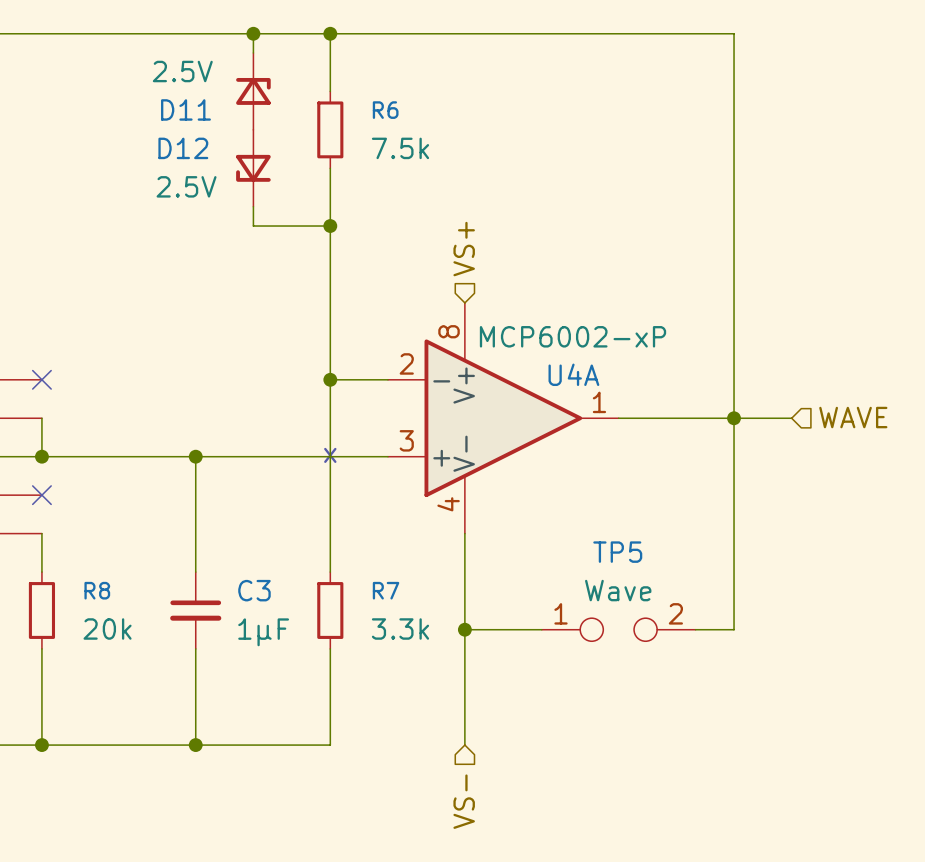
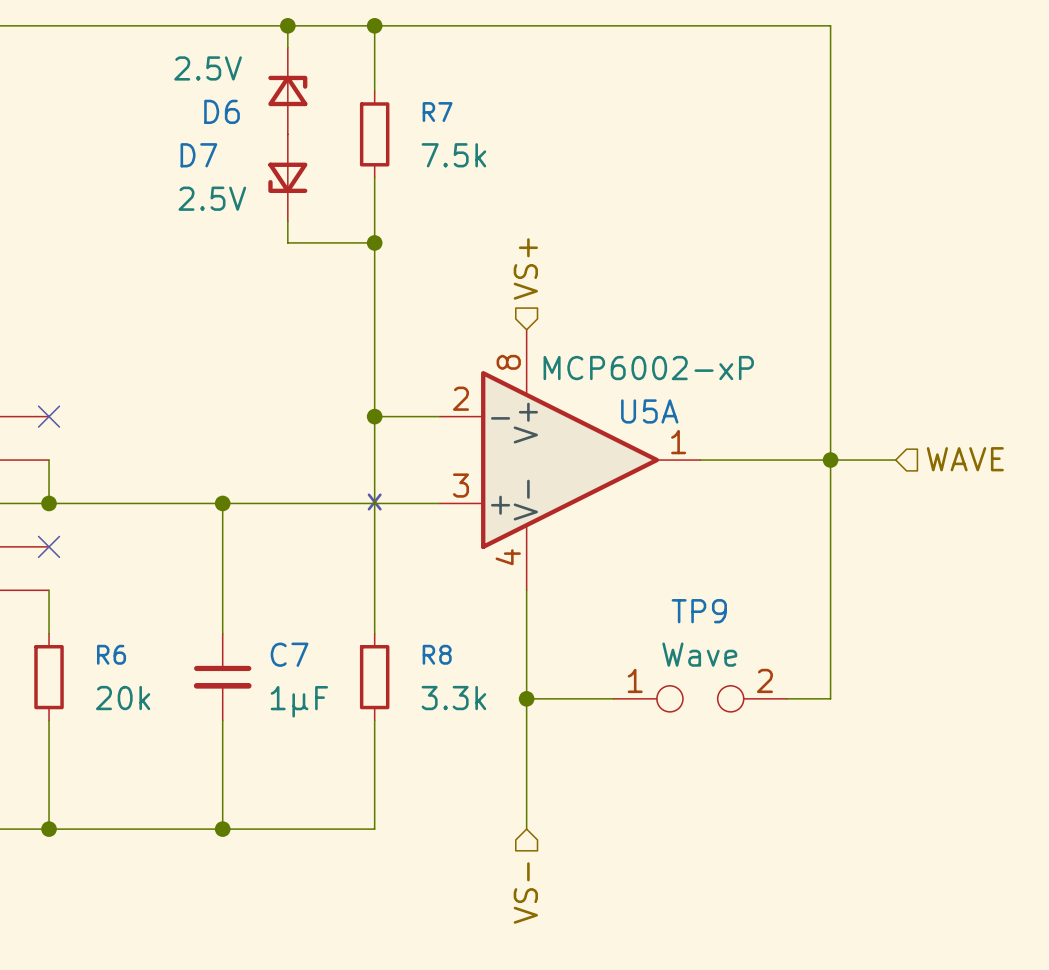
D11 name: D11 (185, 109) -> D6 (222, 111)
R6 name: R6 (385, 110) -> R7 (437, 112)
D12 name: D12 (183, 148) -> D7 (198, 155)
U4A name: U4A (573, 374) -> U5A (649, 411)
TP5 name: TP5 (617, 552) -> TP9 (699, 611)
R8 name: R8 (97, 590) -> R6 (111, 654)
C3 name: C3 (254, 590) -> C7 (289, 654)
R7 name: R7 (386, 590) -> R8 (437, 654)

